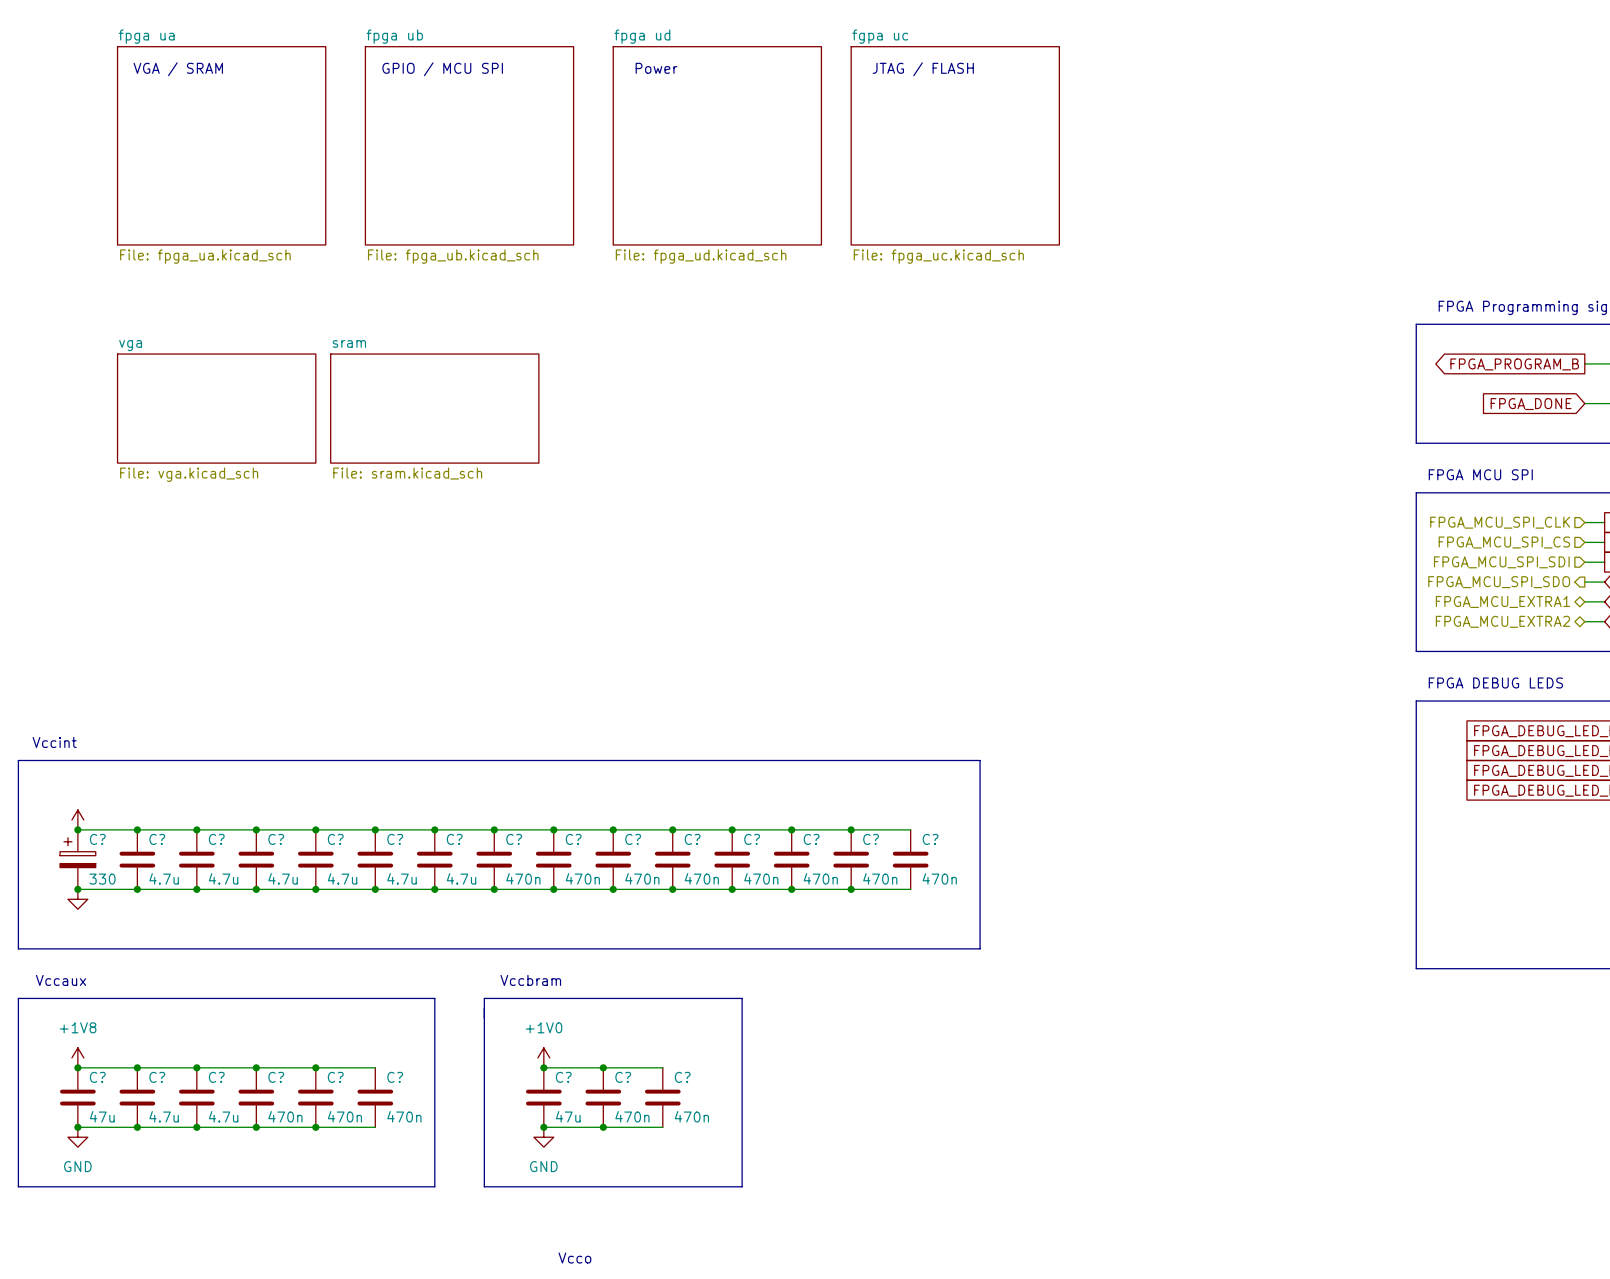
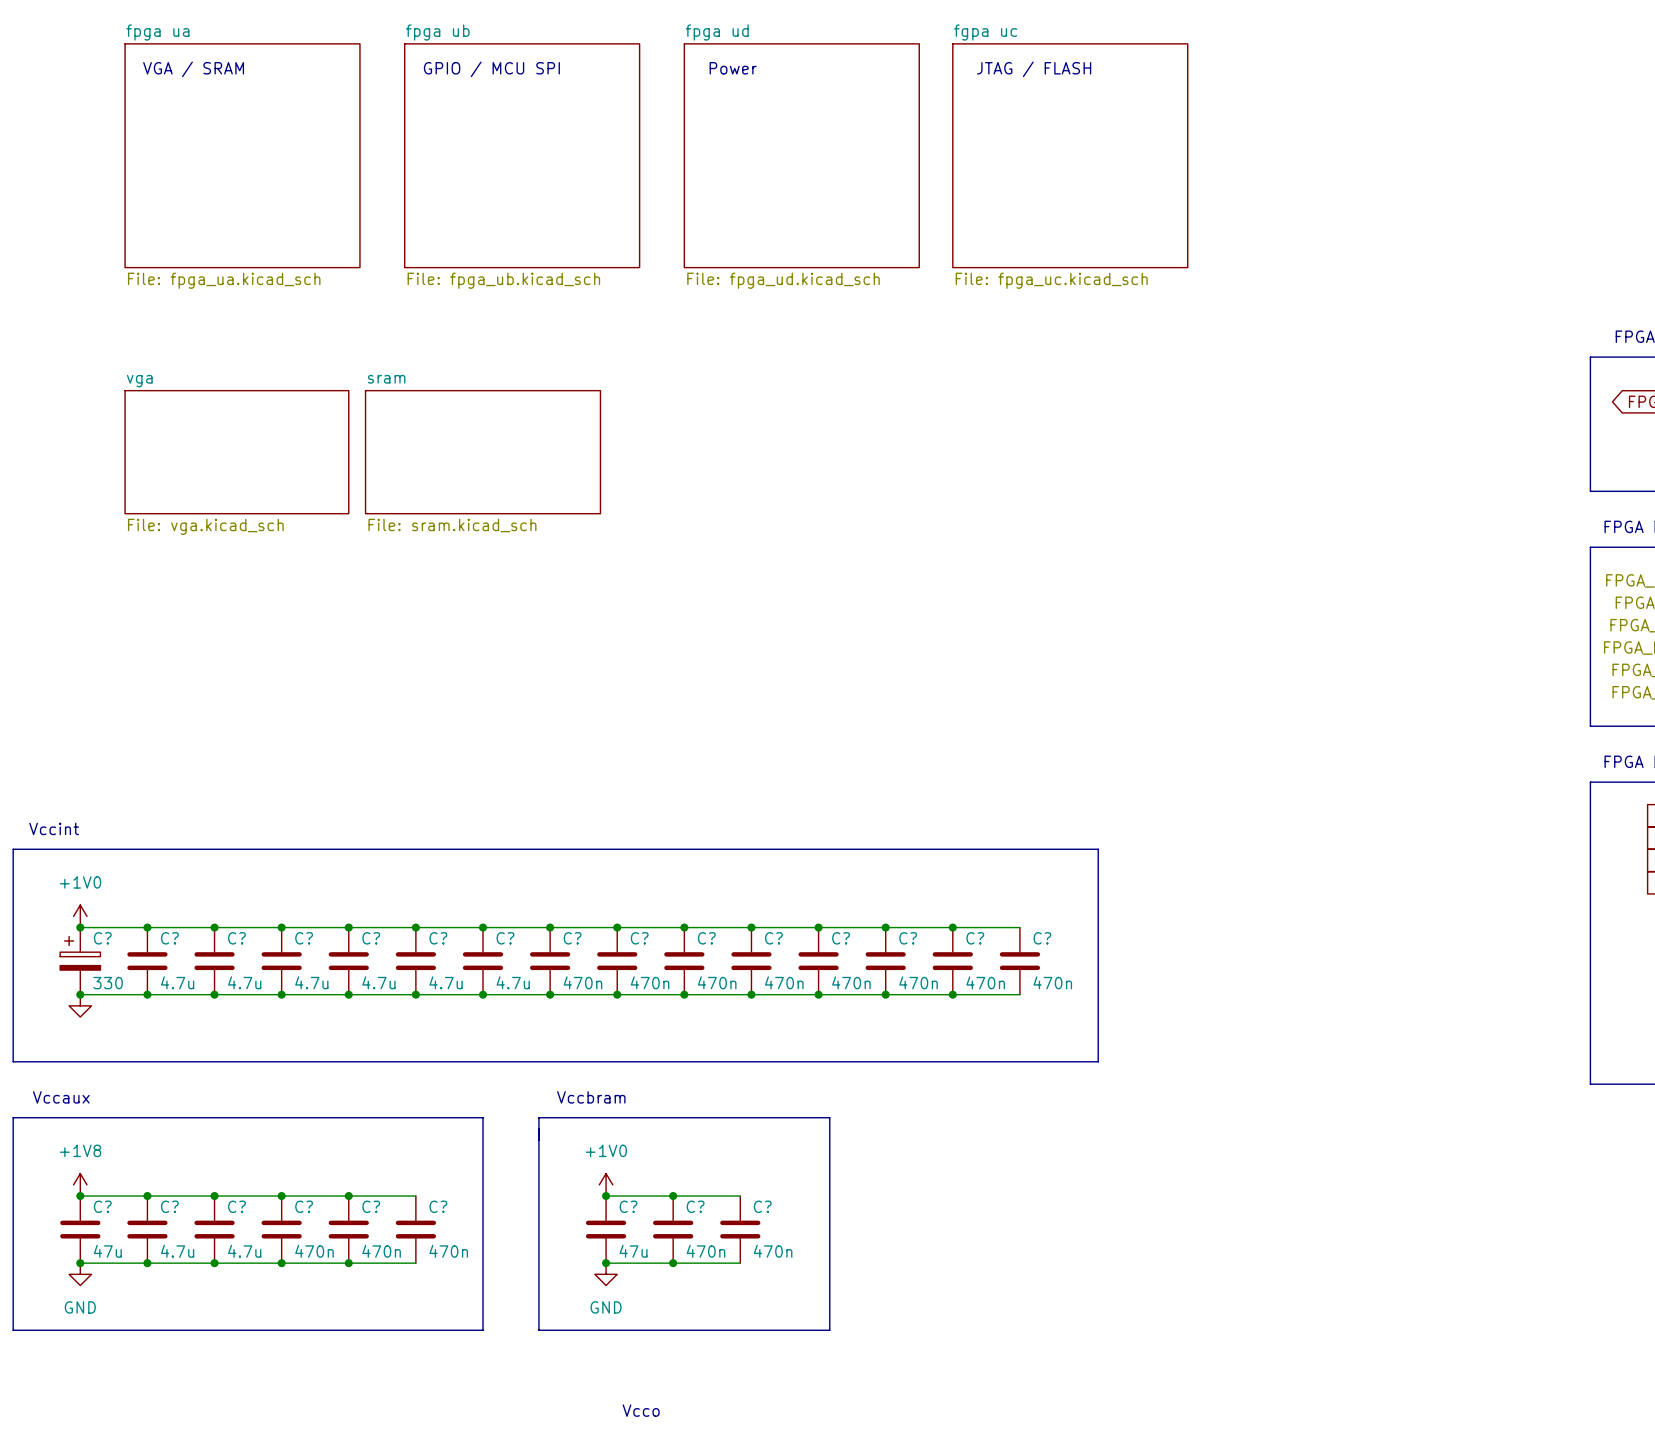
power symbol text: none -> +1V0 (80, 882)

